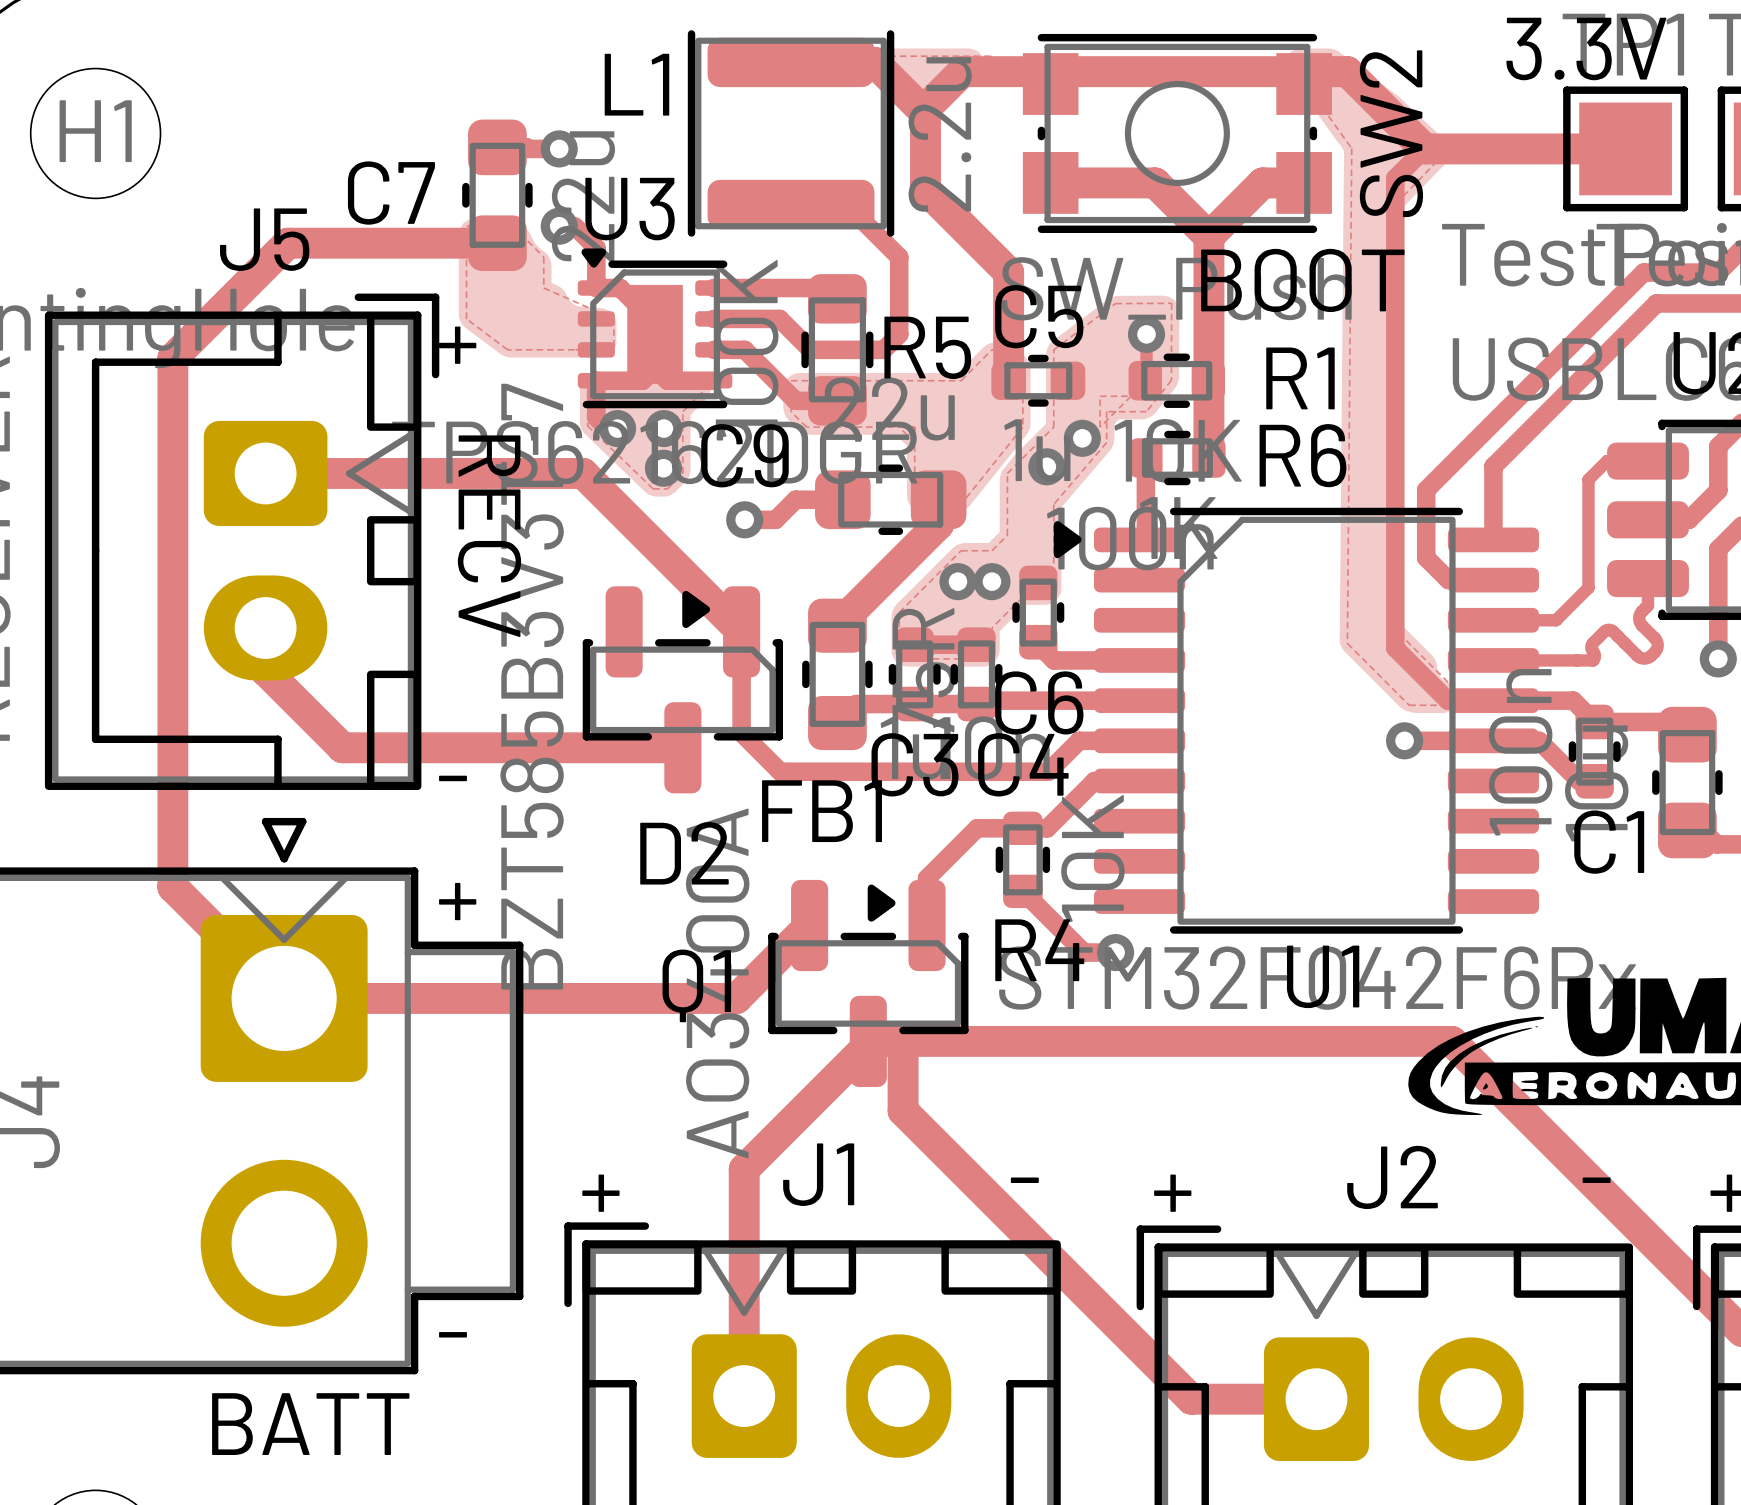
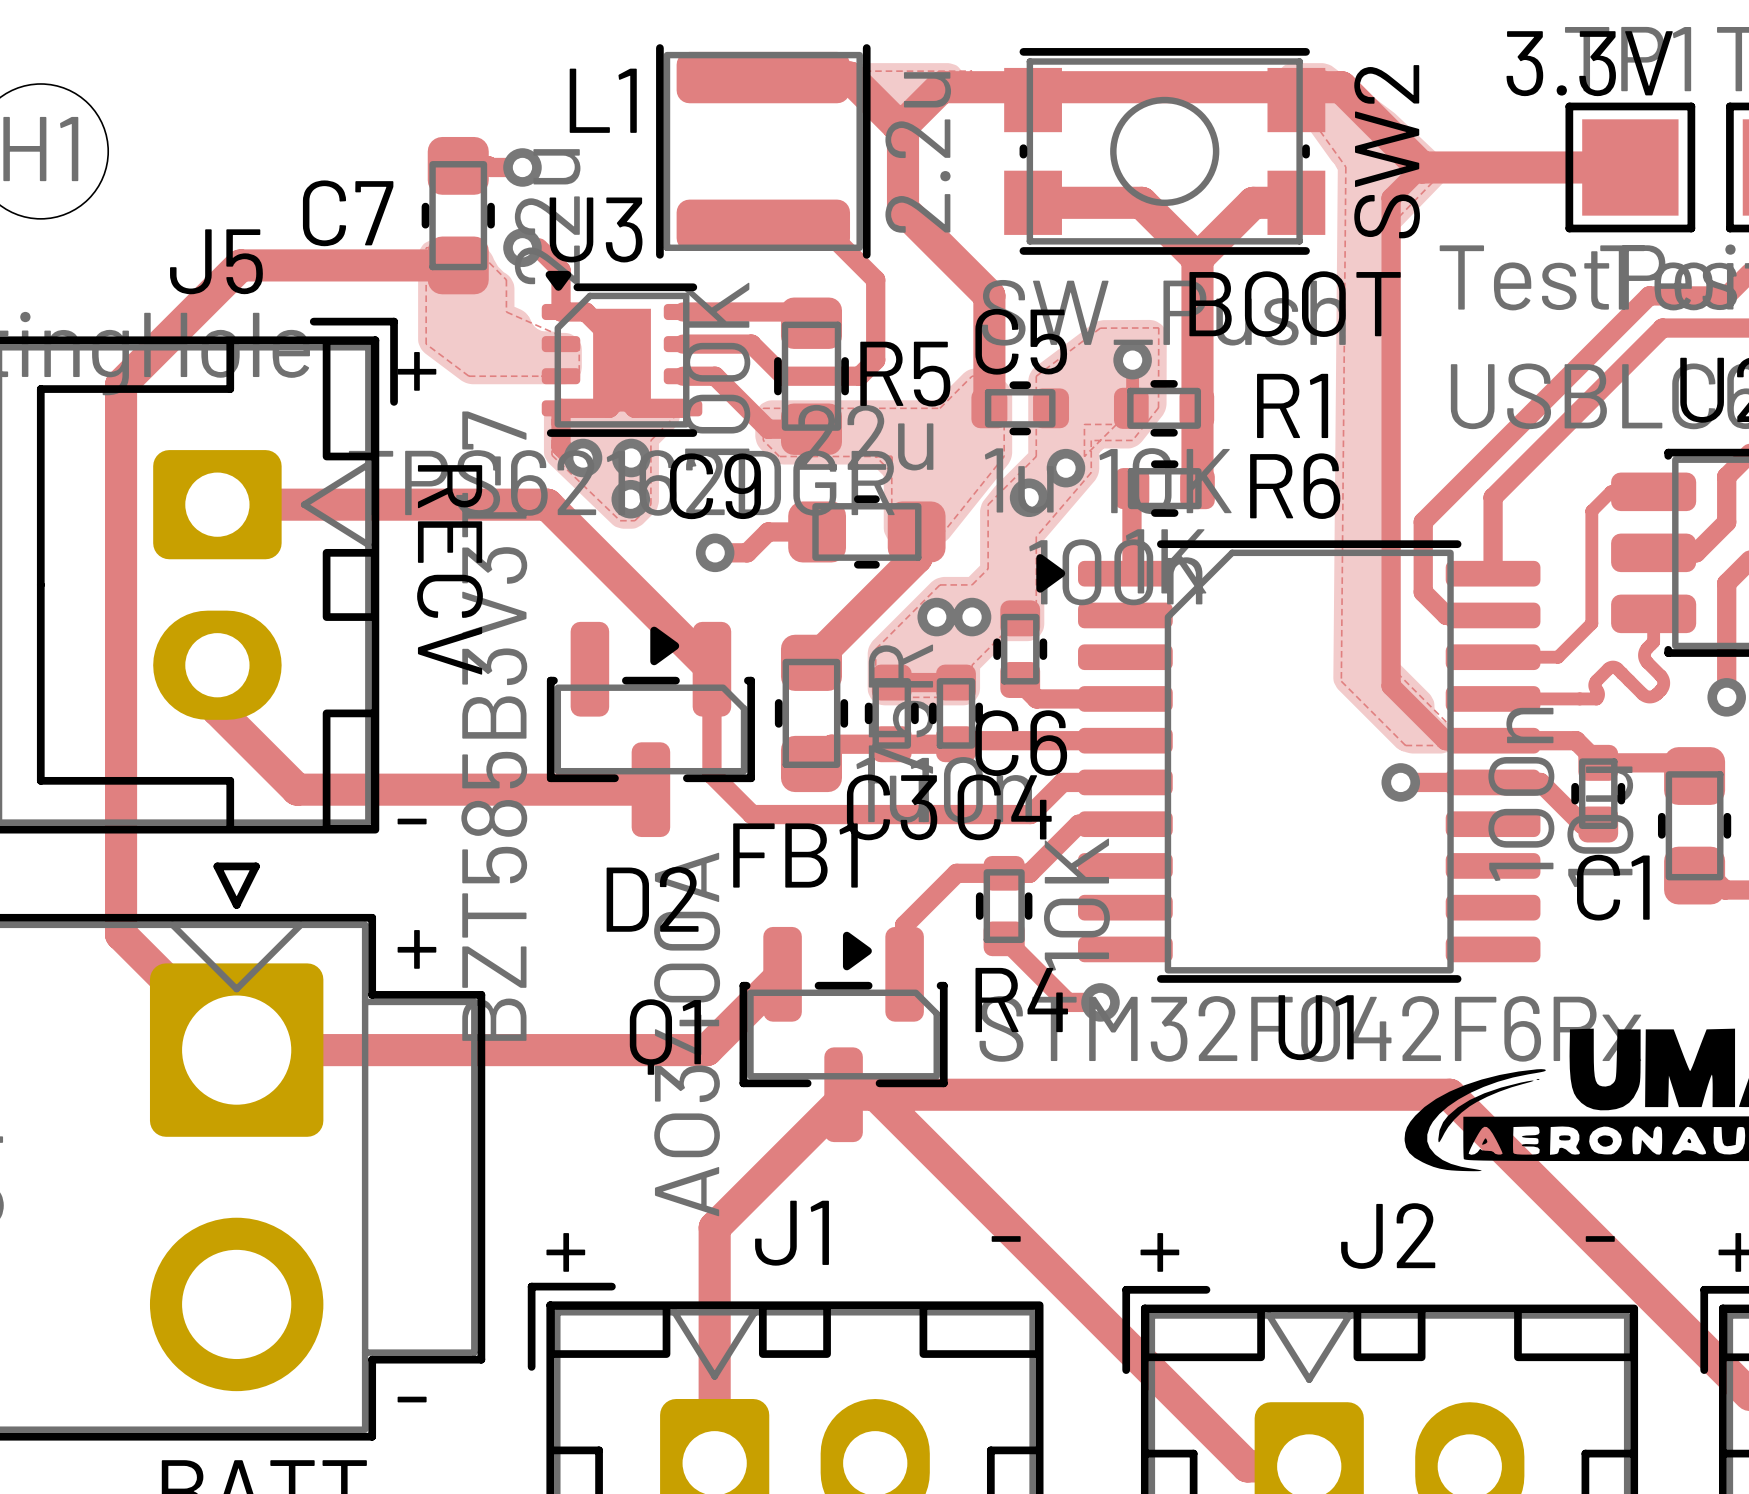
track: (903, 1045) (903, 1110) (1191, 1399) (1257, 1399) -> (879, 1098) (1247, 1466)

